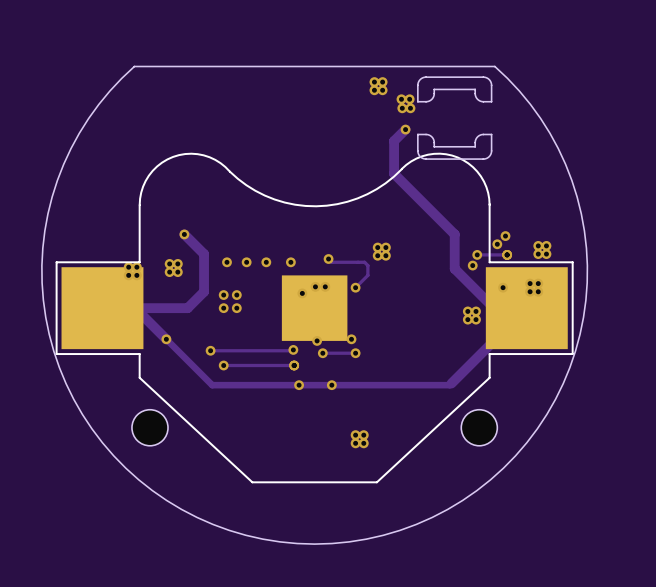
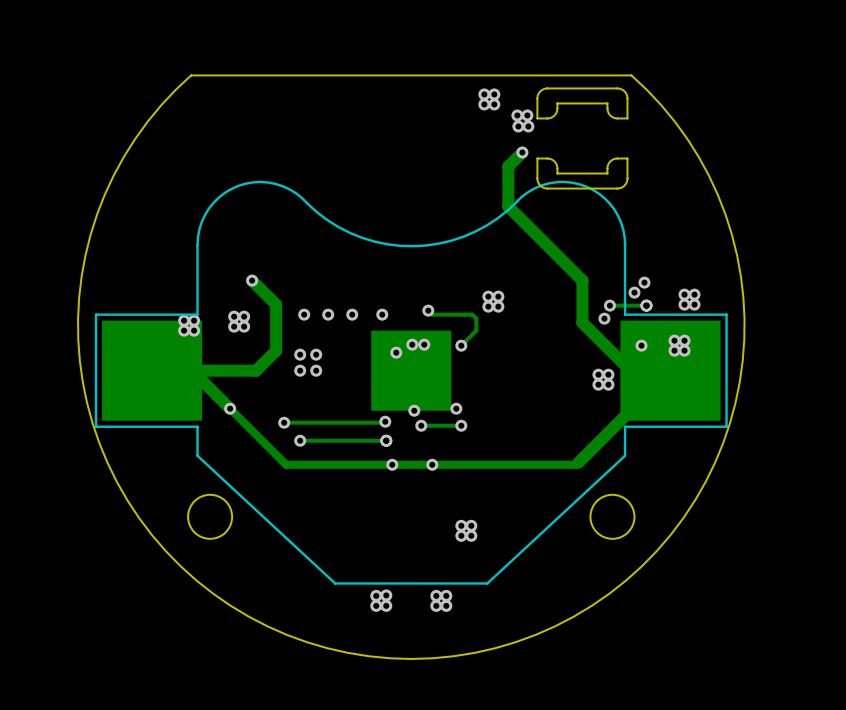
via: none -> (376, 595)
via: none -> (386, 595)
via: none -> (436, 595)
via: none -> (446, 595)
via: none -> (376, 605)
via: none -> (386, 605)
via: none -> (436, 605)
via: none -> (446, 605)

